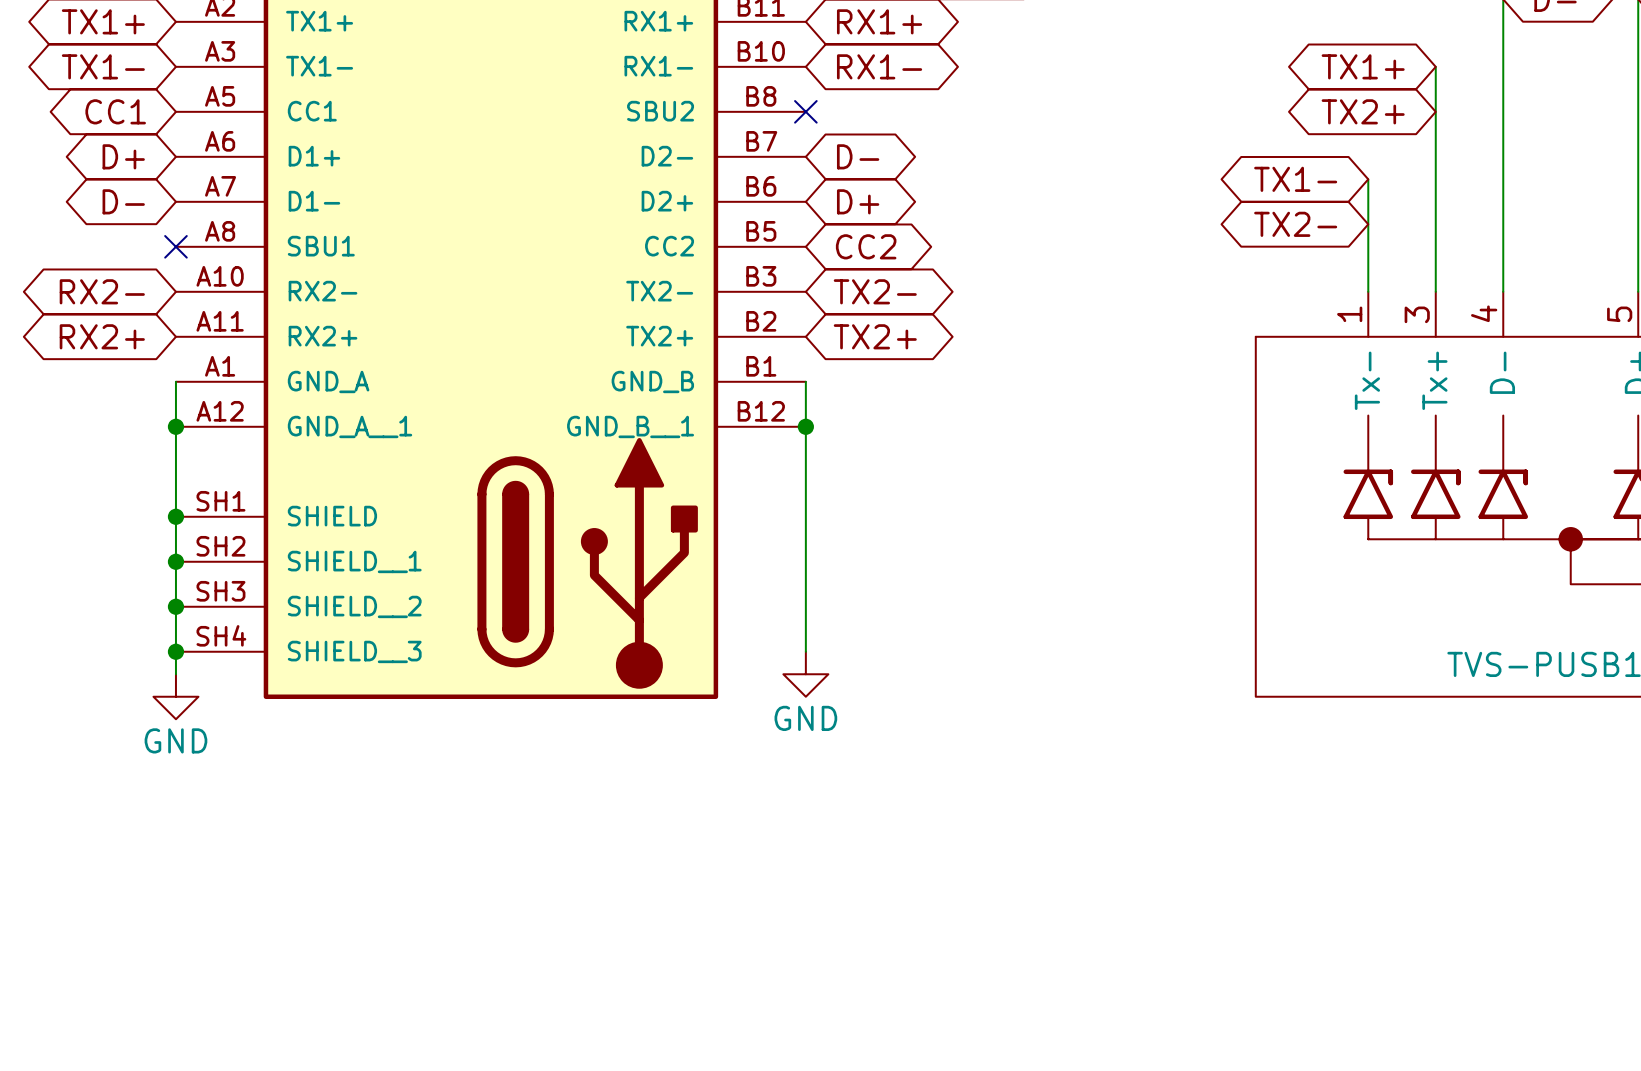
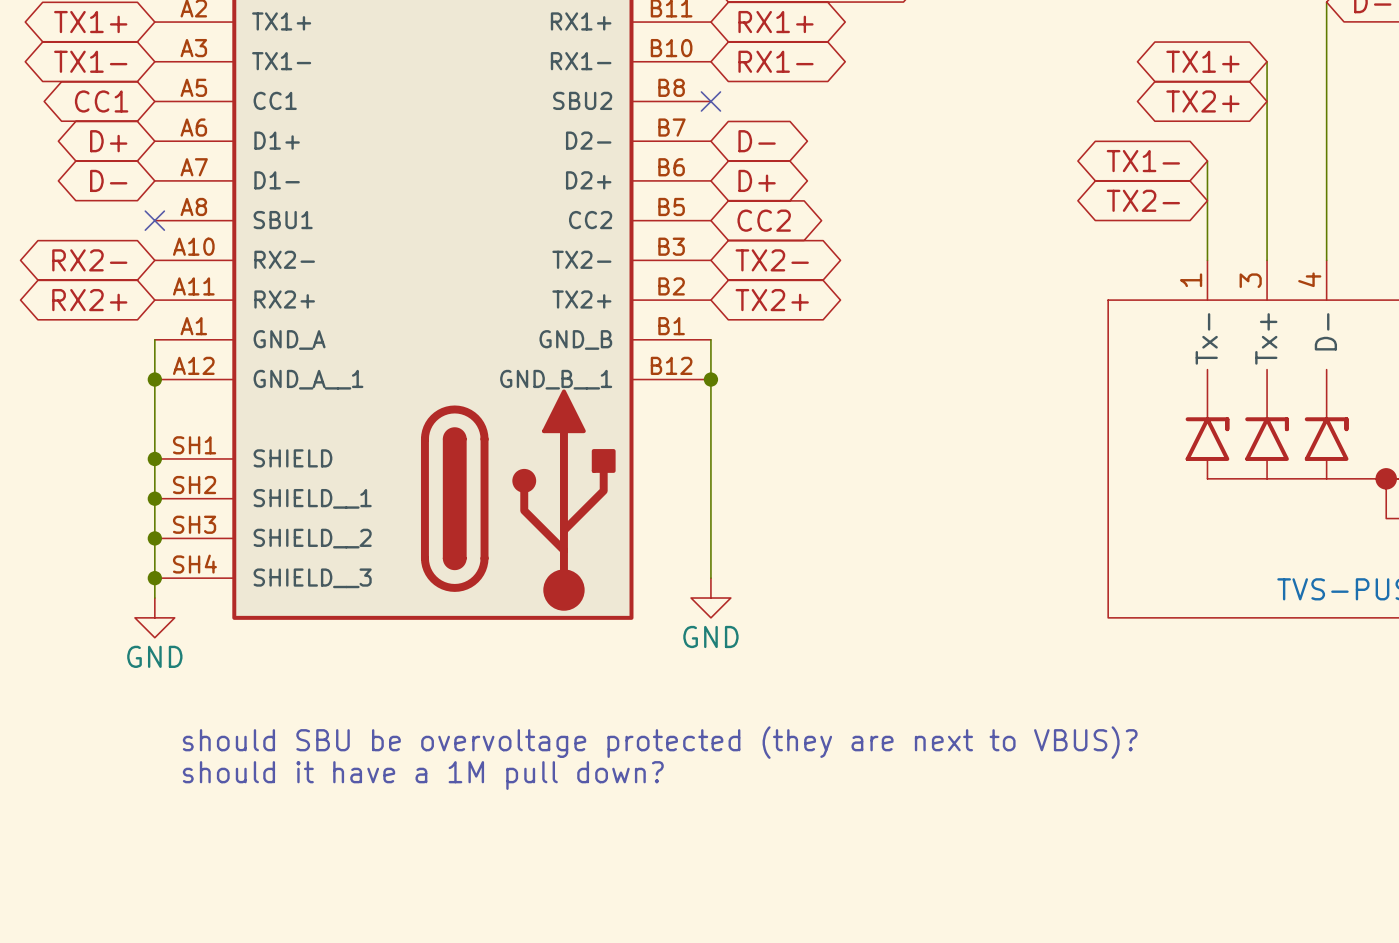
text: none -> should SBU be overvoltage protected (they are next to VBUS)? (660, 742)
text: none -> should it have a 1M pull down? (423, 775)

